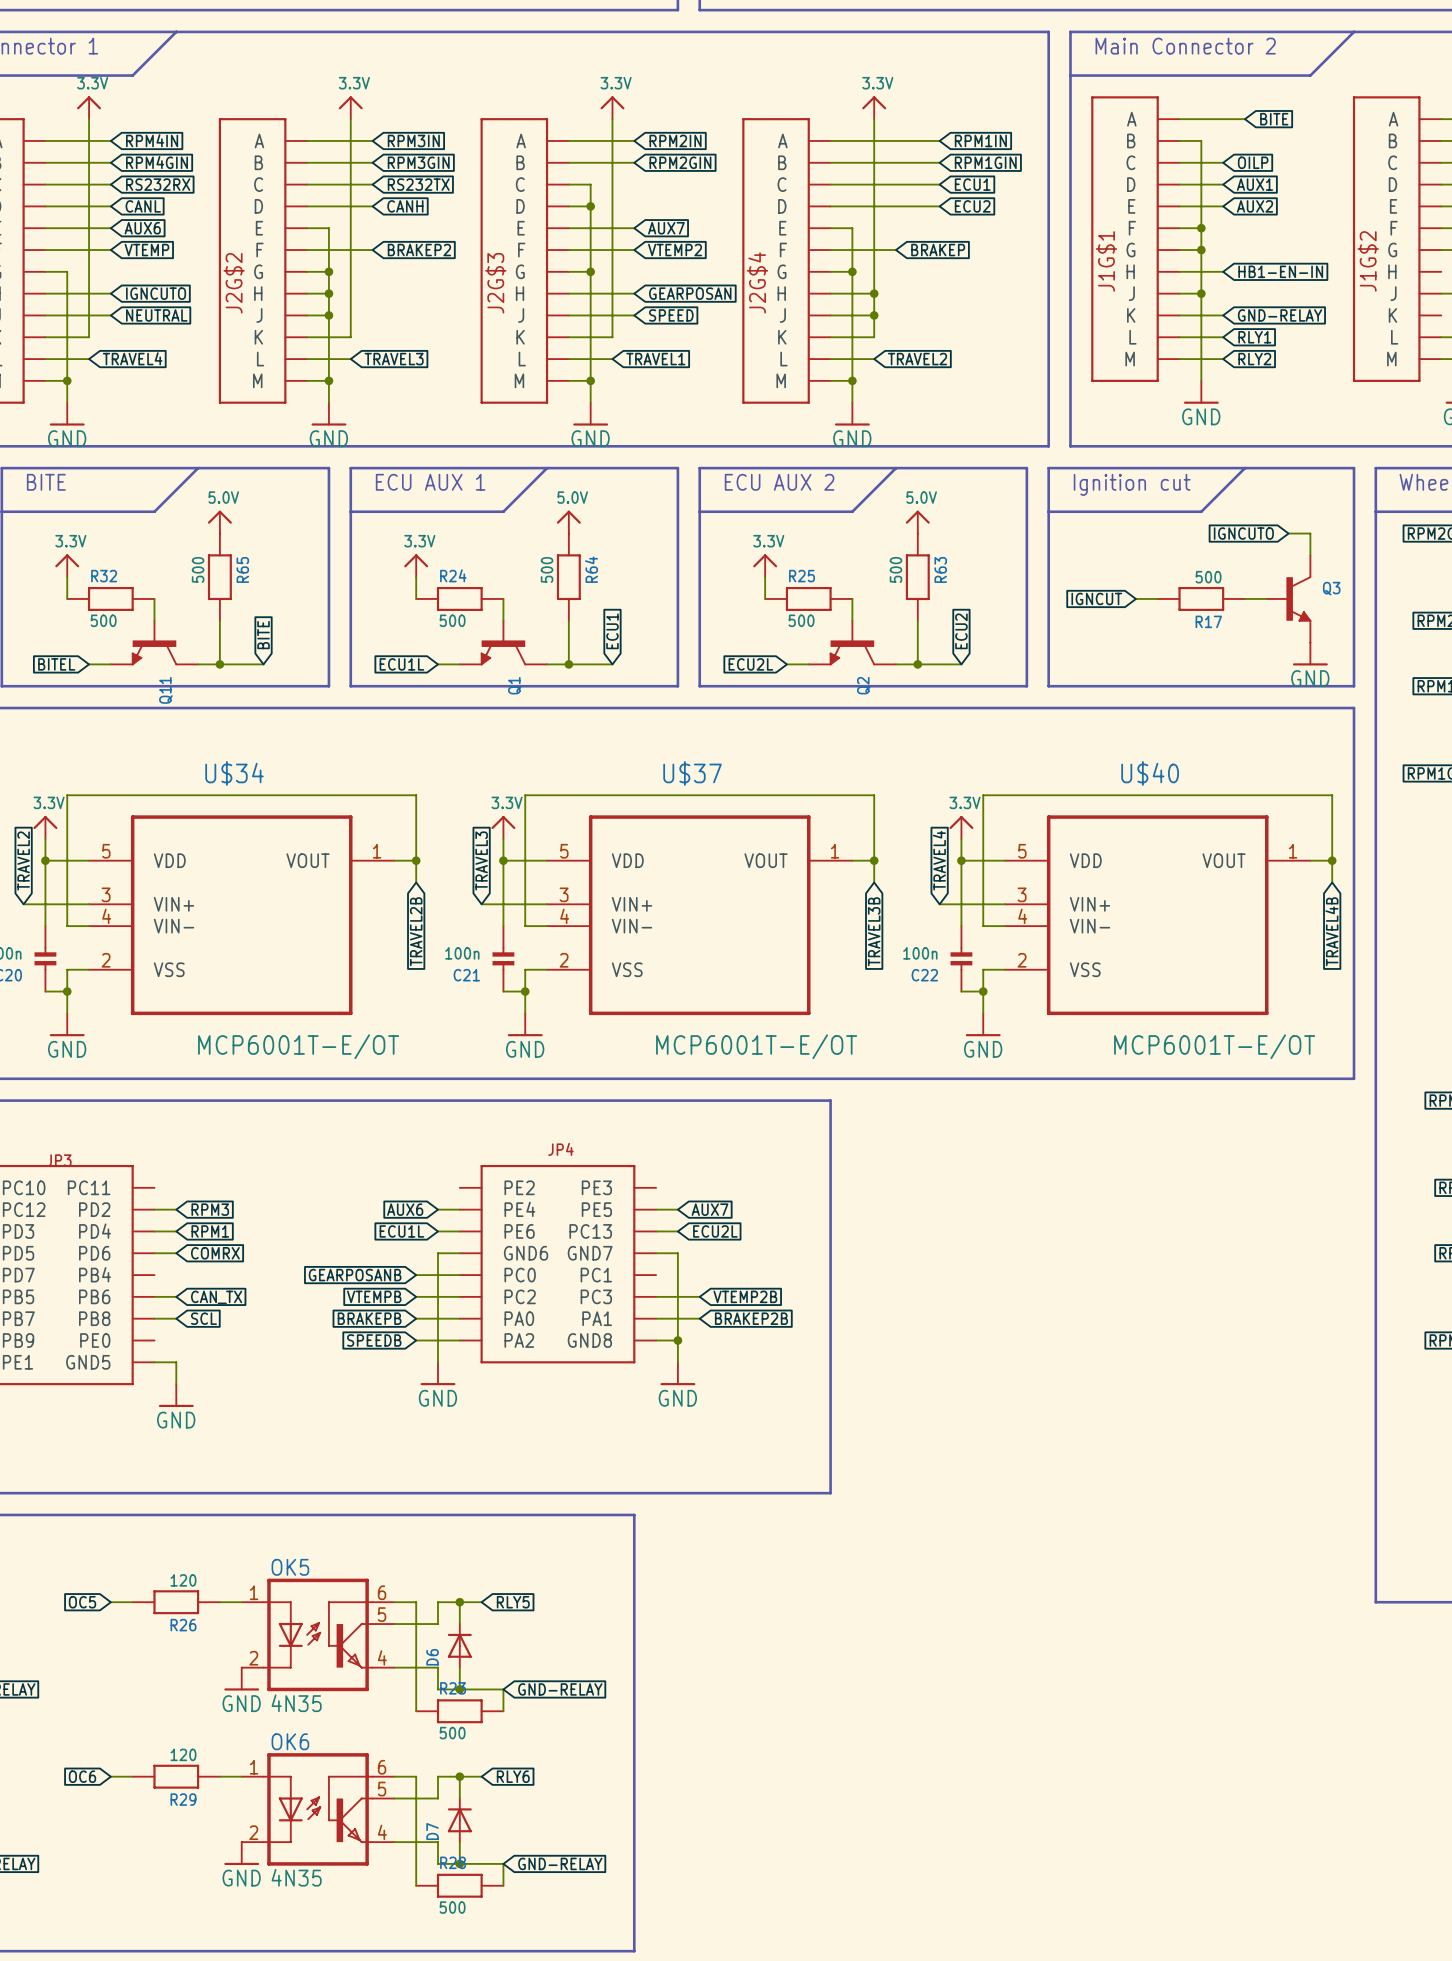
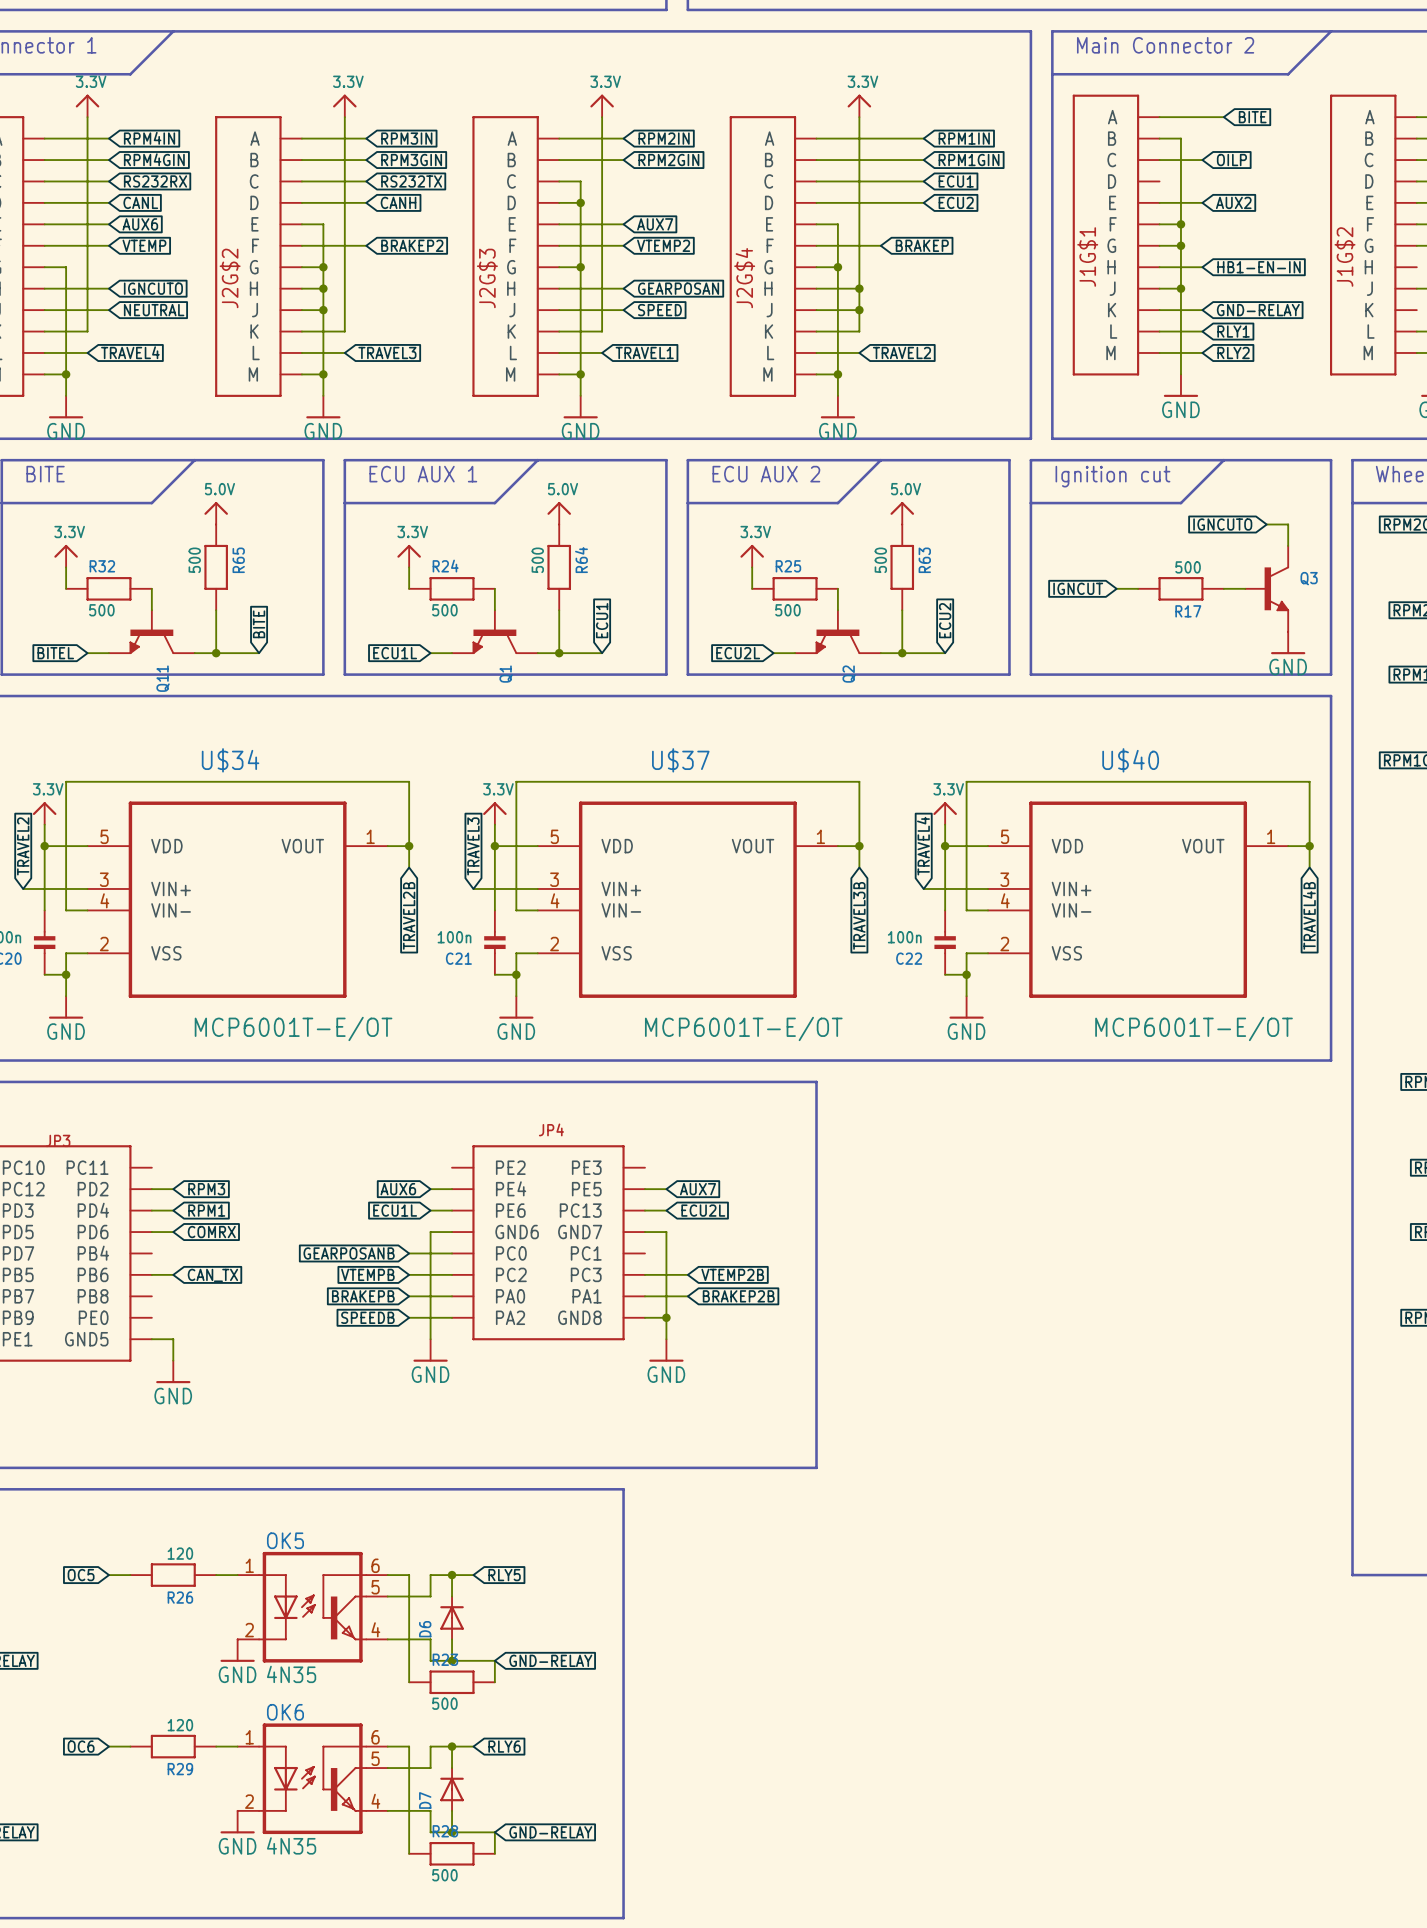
wire: (1179, 184) (1223, 184) -> none
global label: AUX1 (1255, 184) -> none
wire: (154, 1318) (176, 1318) -> none
global label: SCL (203, 1318) -> none

